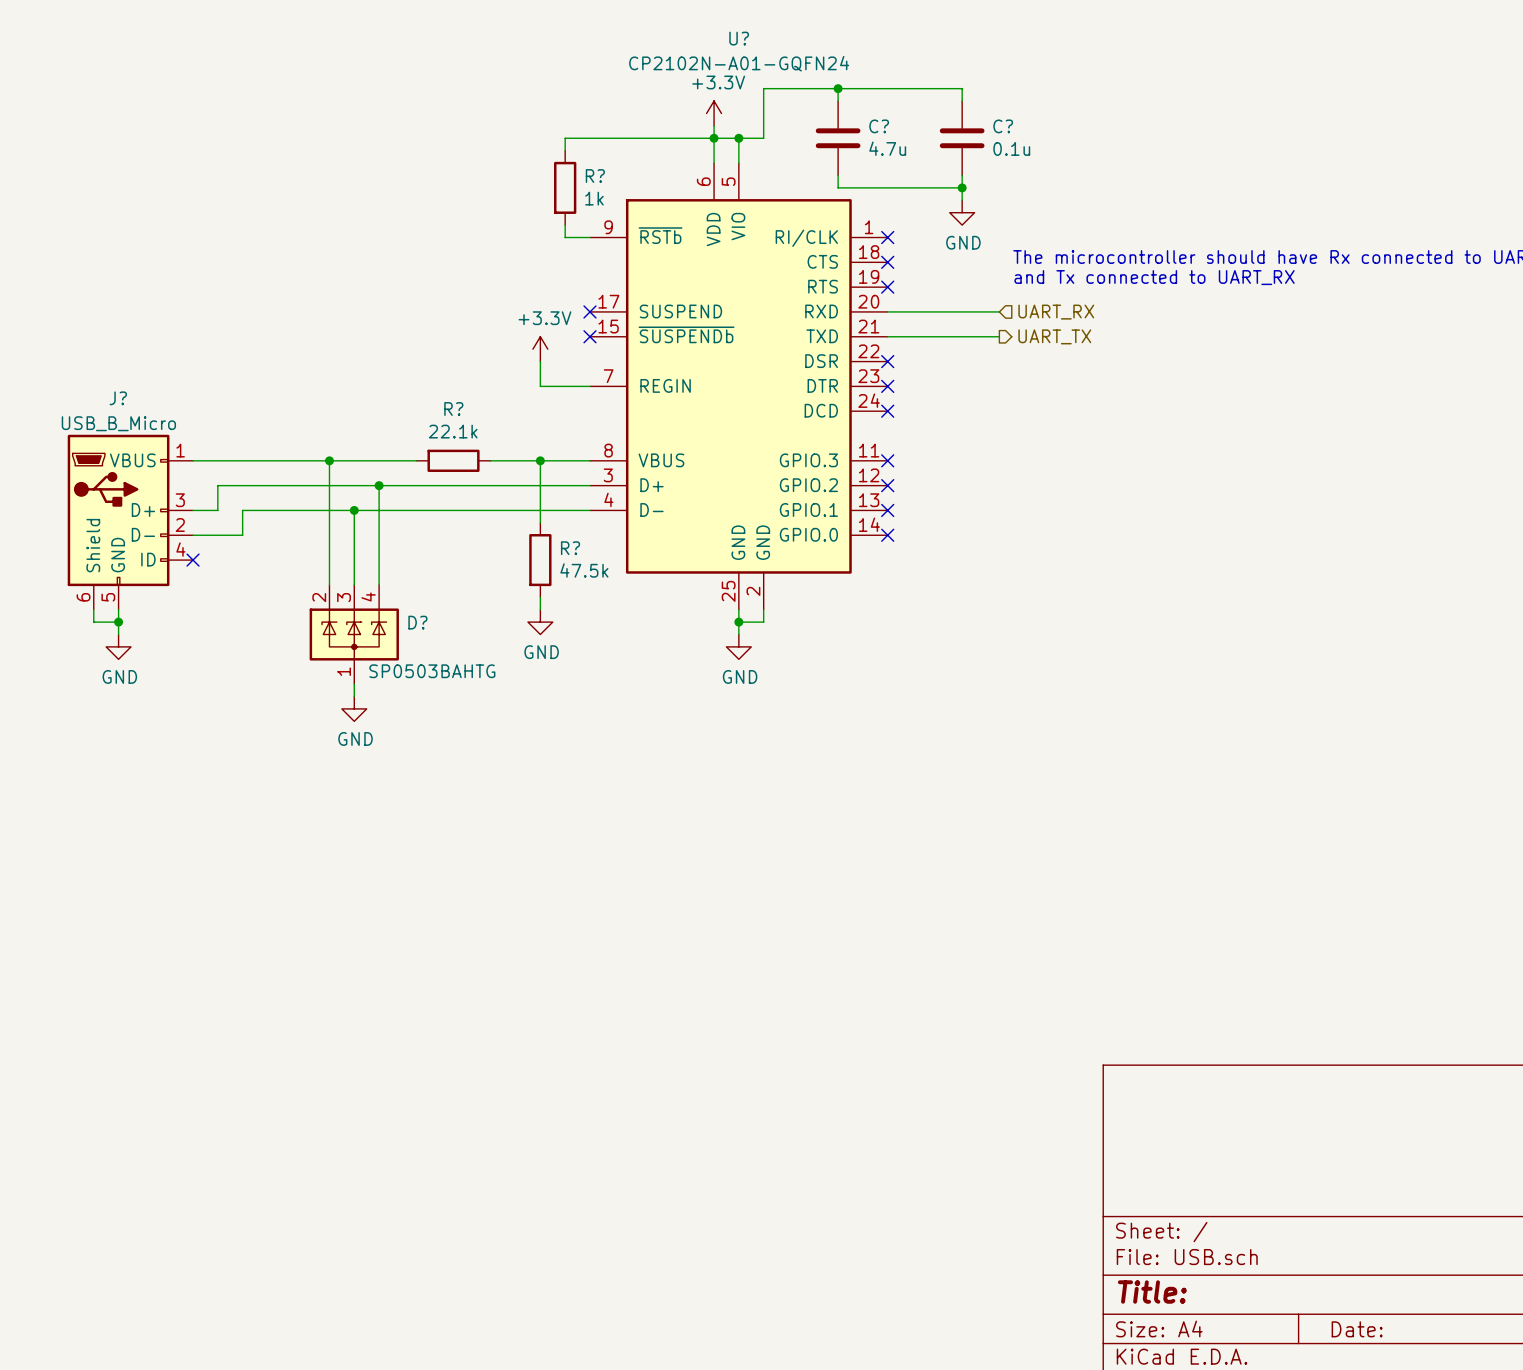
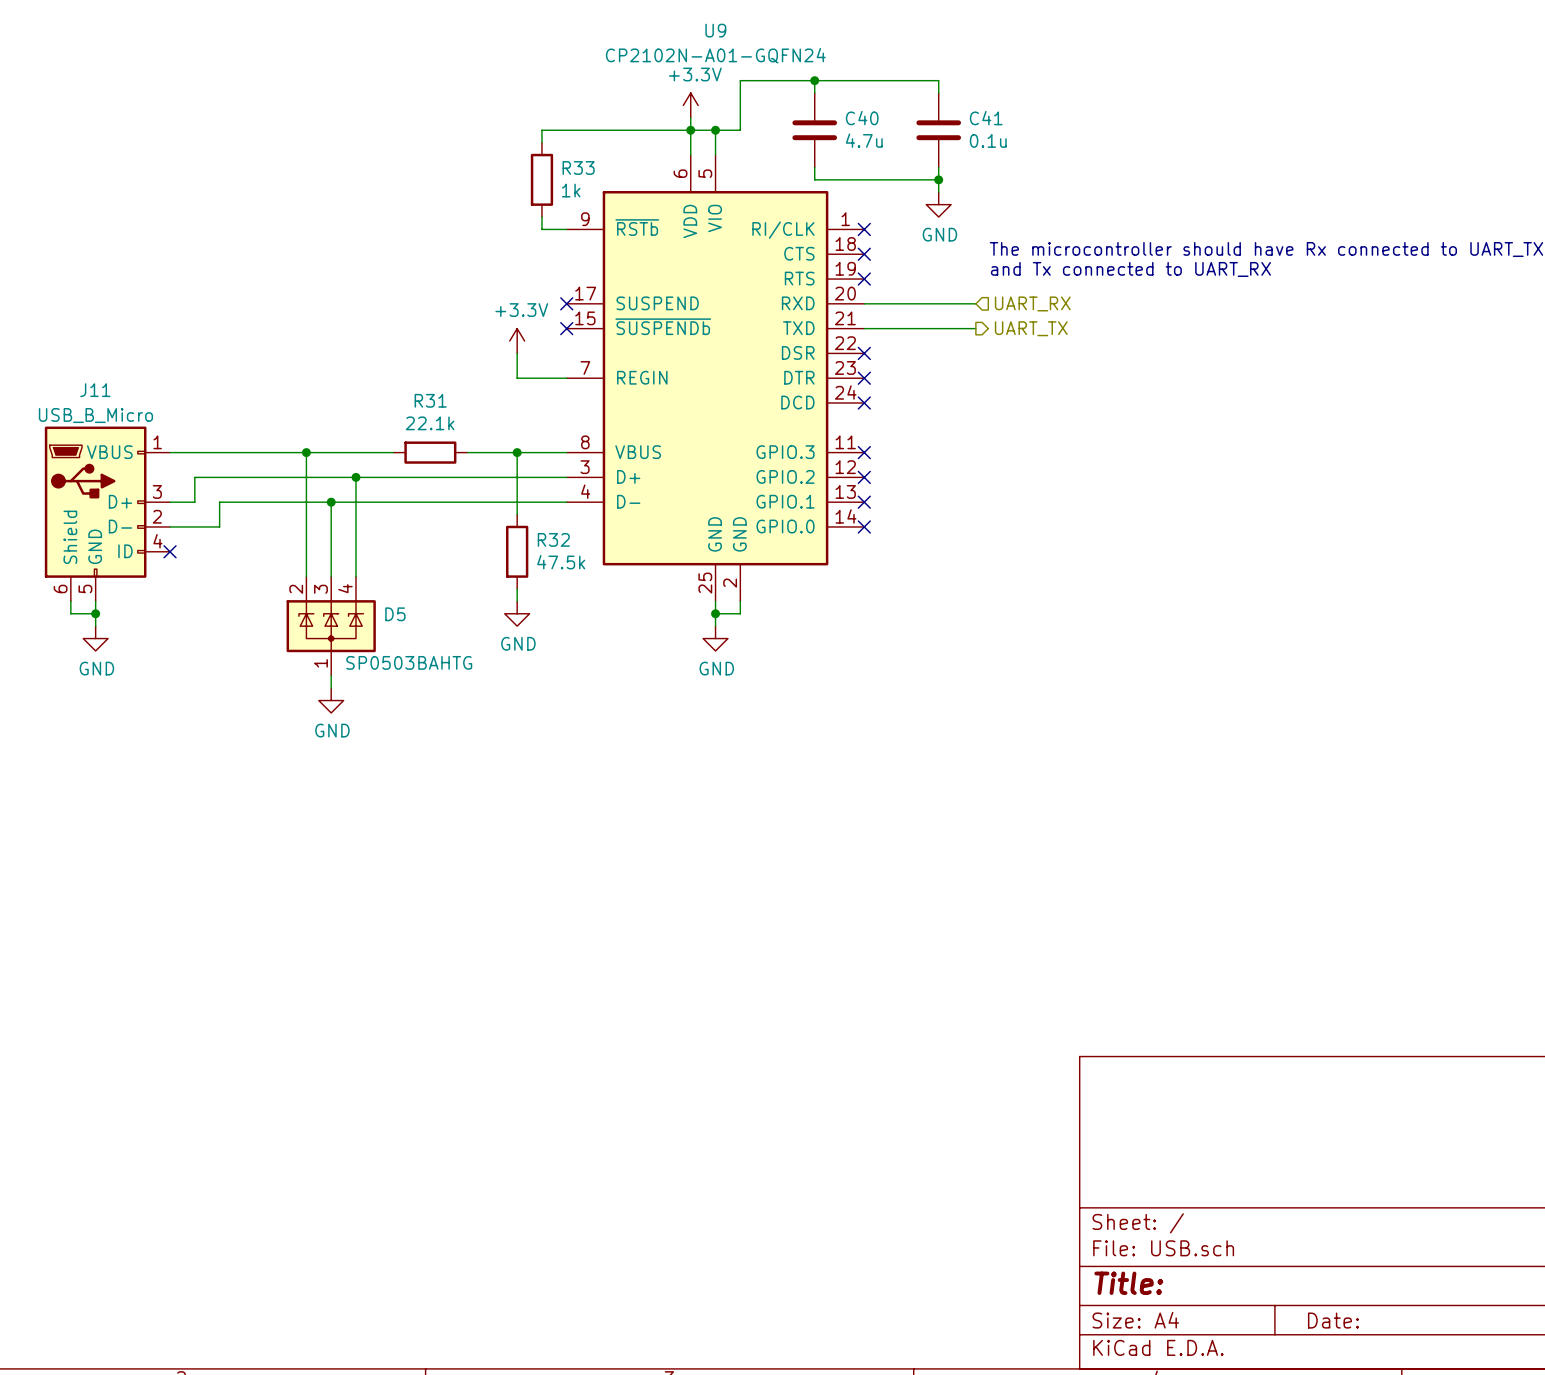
U? name: U? (739, 38) -> U9 (715, 30)
C? name: C? (879, 126) -> C40 (862, 118)
C? name: C? (1003, 126) -> C41 (986, 118)
R? name: R? (595, 176) -> R33 (578, 167)
J? name: J? (118, 398) -> J11 (95, 390)
R? name: R? (453, 409) -> R31 (430, 400)
R? name: R? (570, 548) -> R32 (553, 539)
D? name: D? (417, 622) -> D5 (395, 614)

